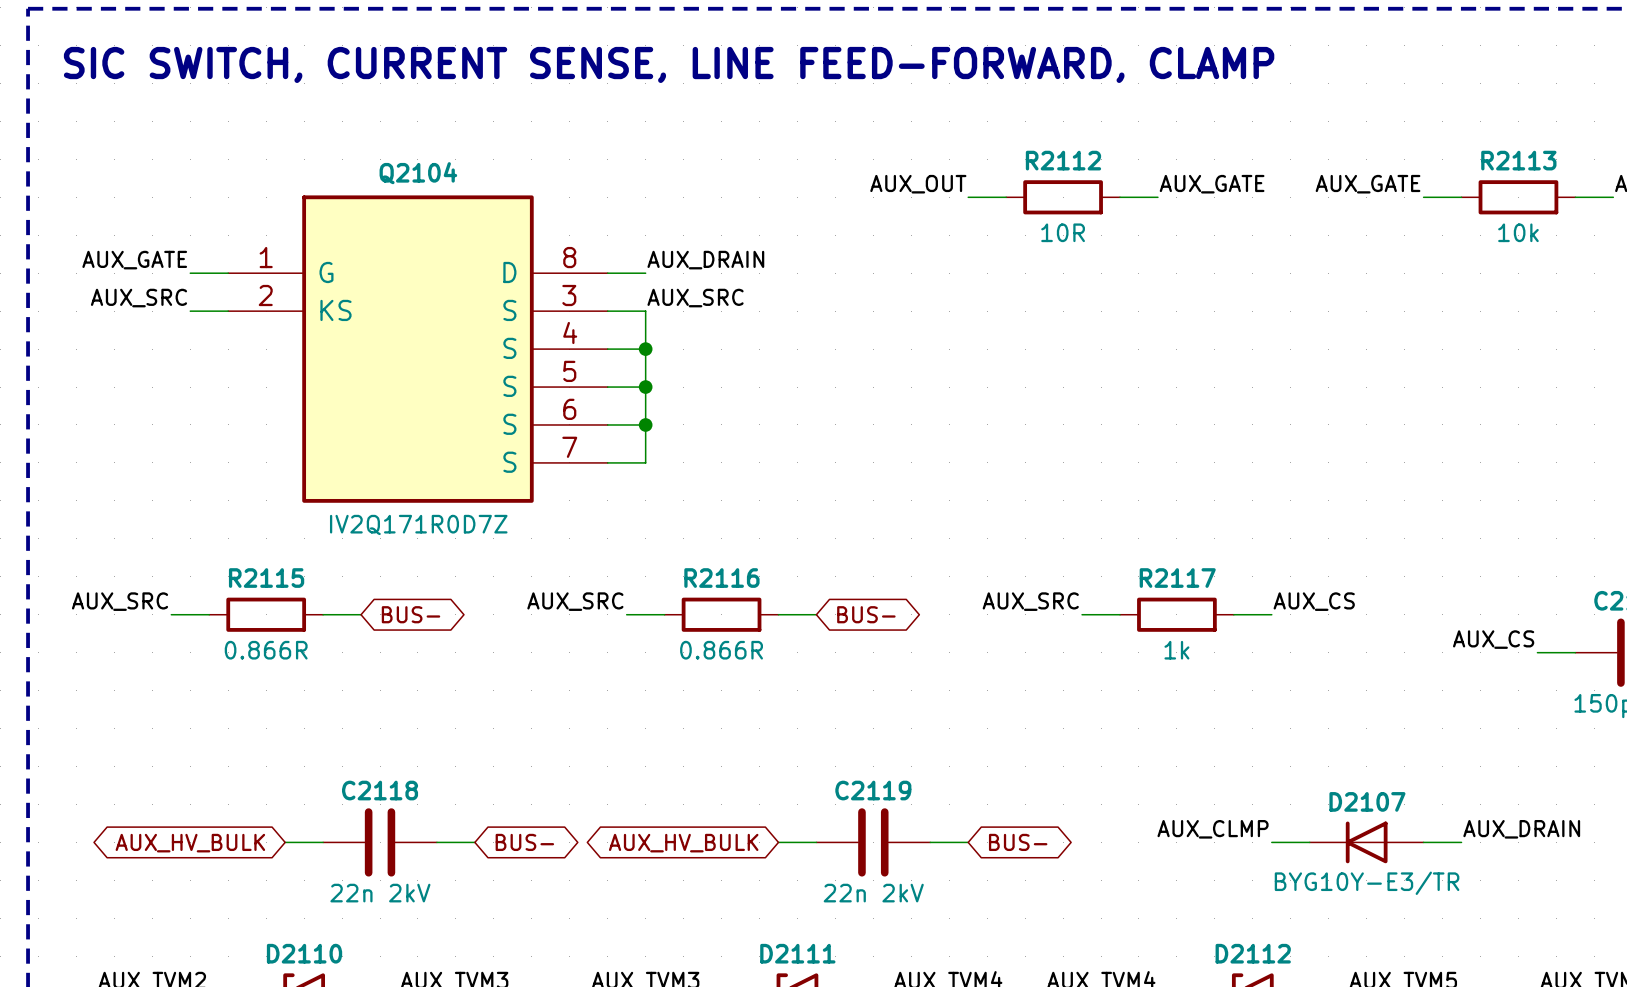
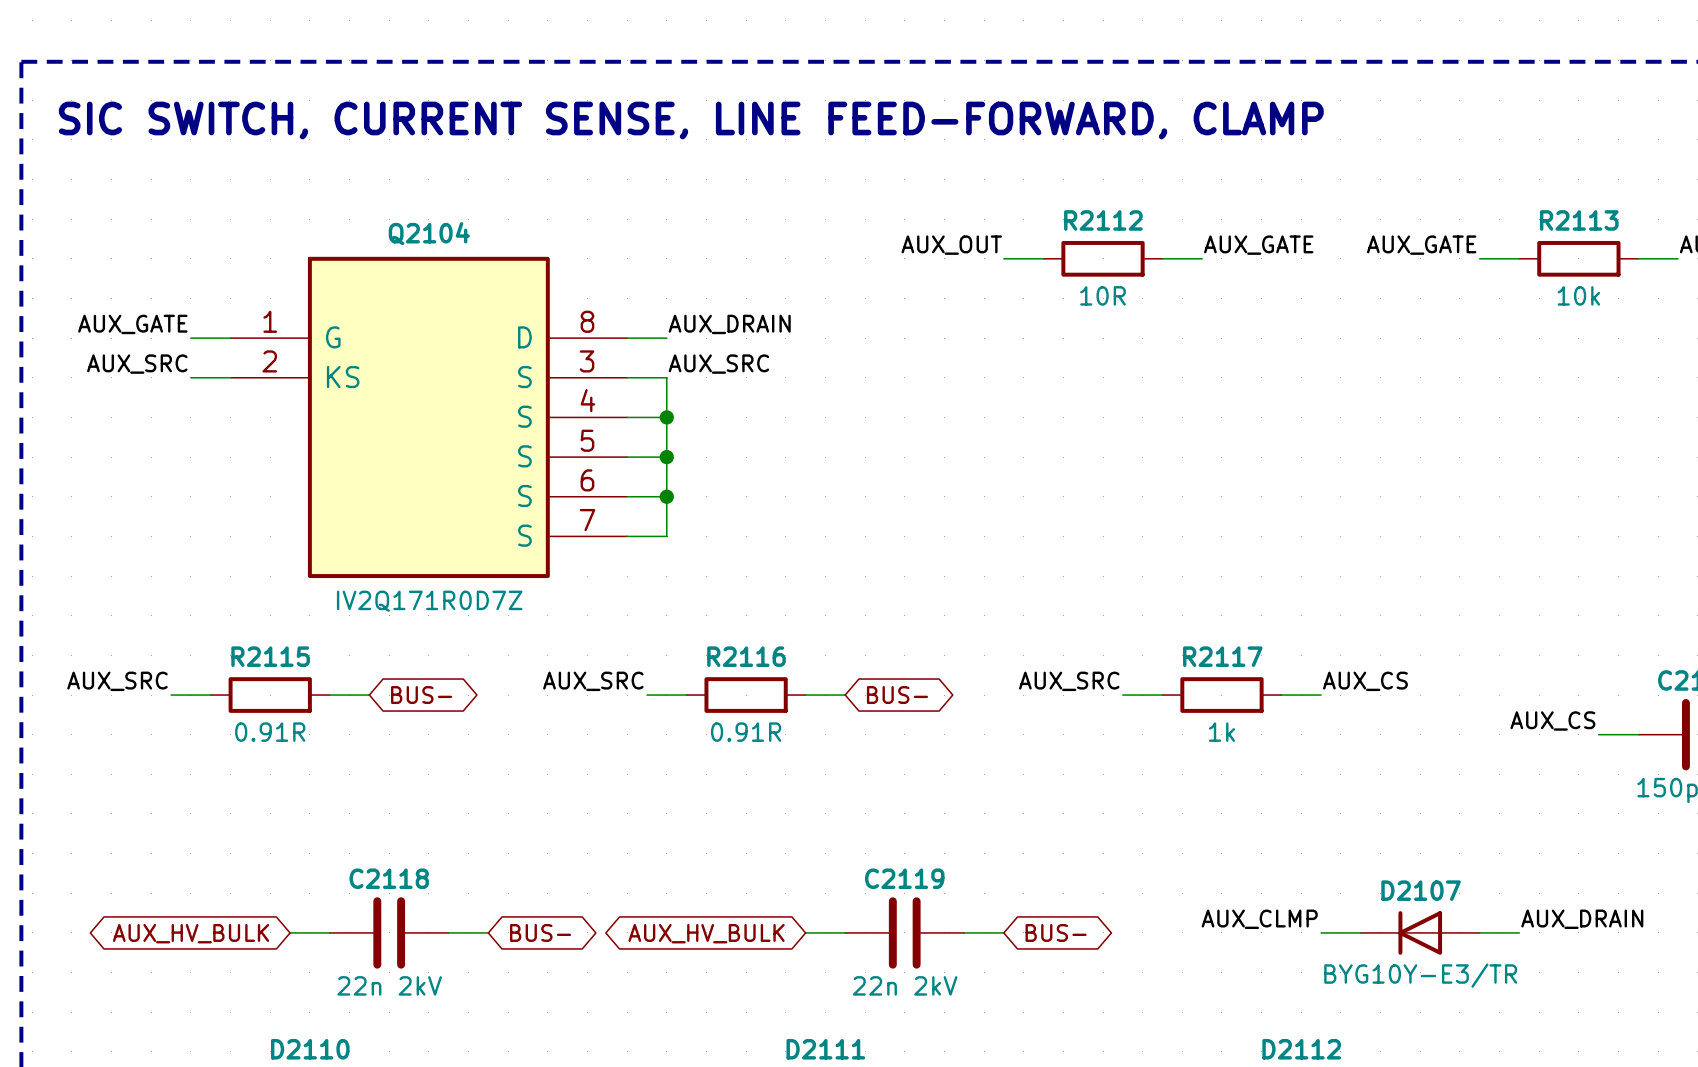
R2115 value: 0.866R (266, 650) -> 0.91R (270, 732)
R2116 value: 0.866R (721, 650) -> 0.91R (746, 732)

